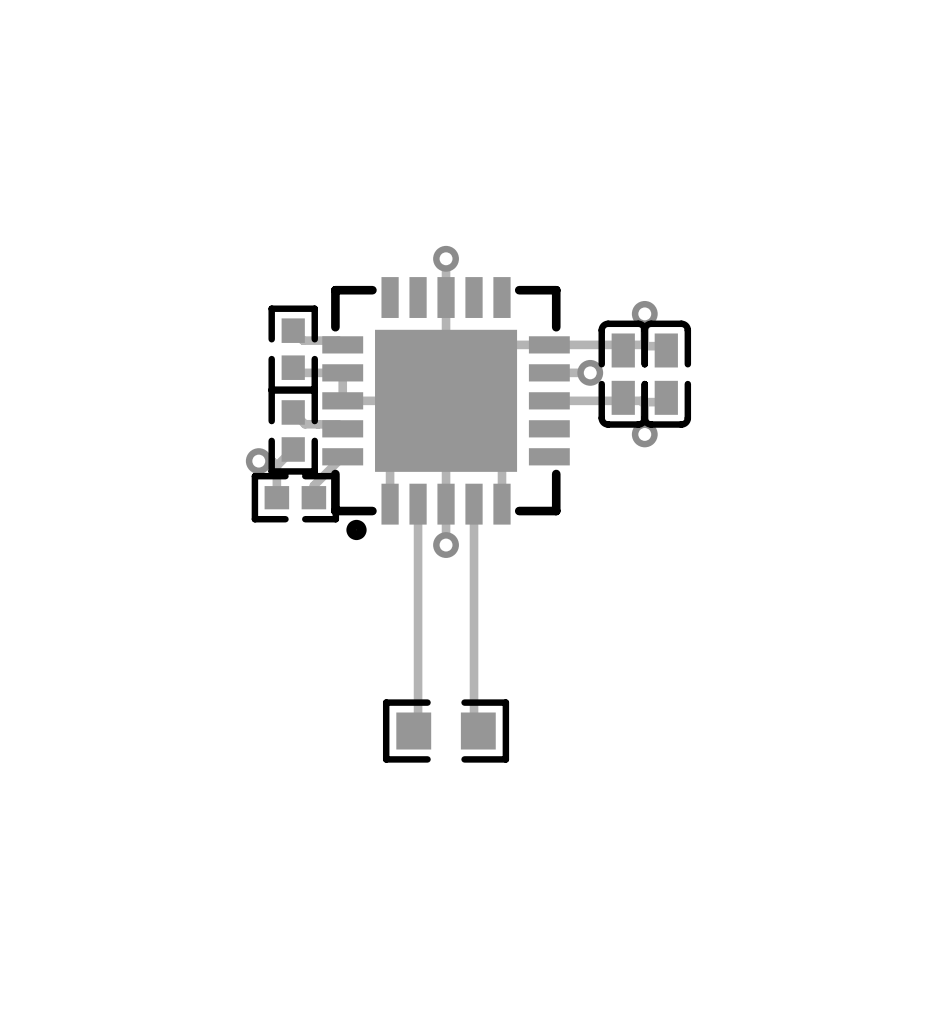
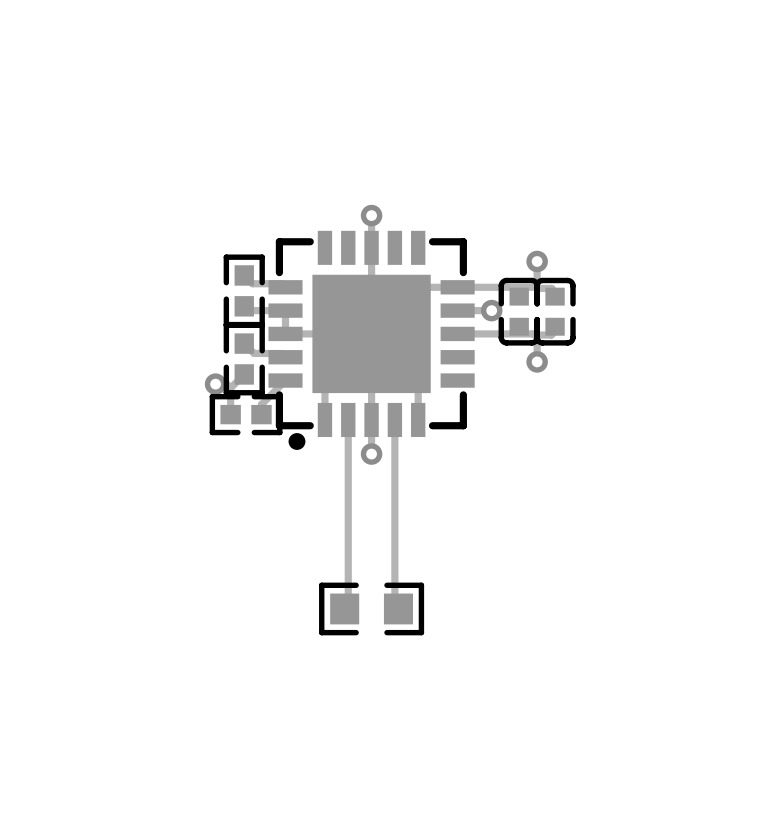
part footprint: [598, 320, 649, 428] -> [498, 277, 540, 346]
part footprint: [641, 320, 692, 428] -> [534, 277, 576, 346]

